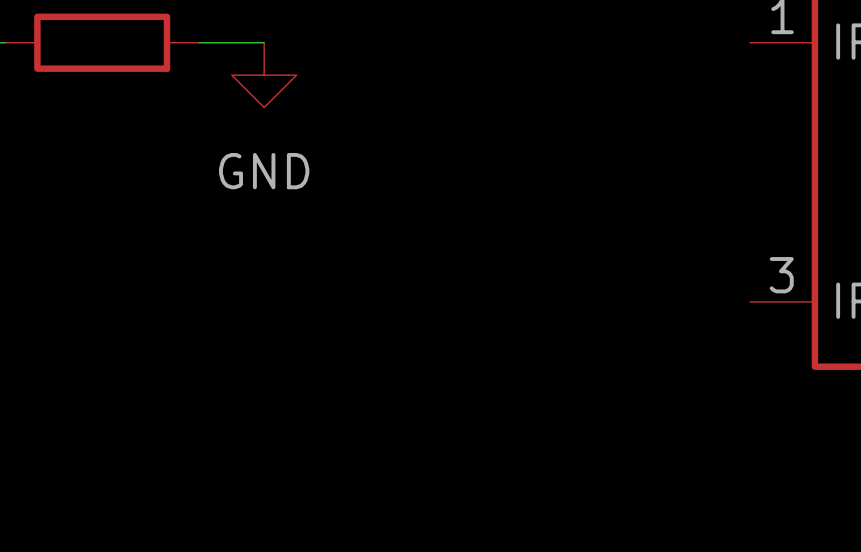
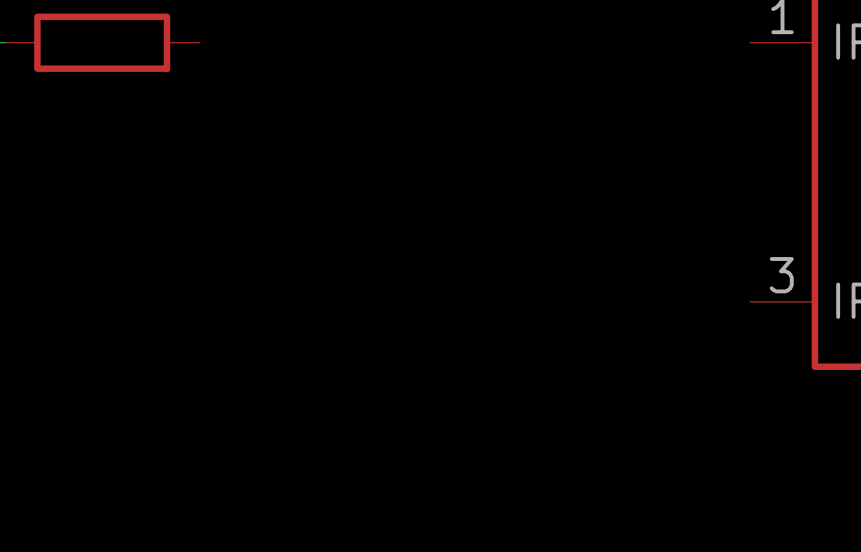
wire: (199, 42) (264, 42) -> none
power symbol: GND (264, 75) -> none

